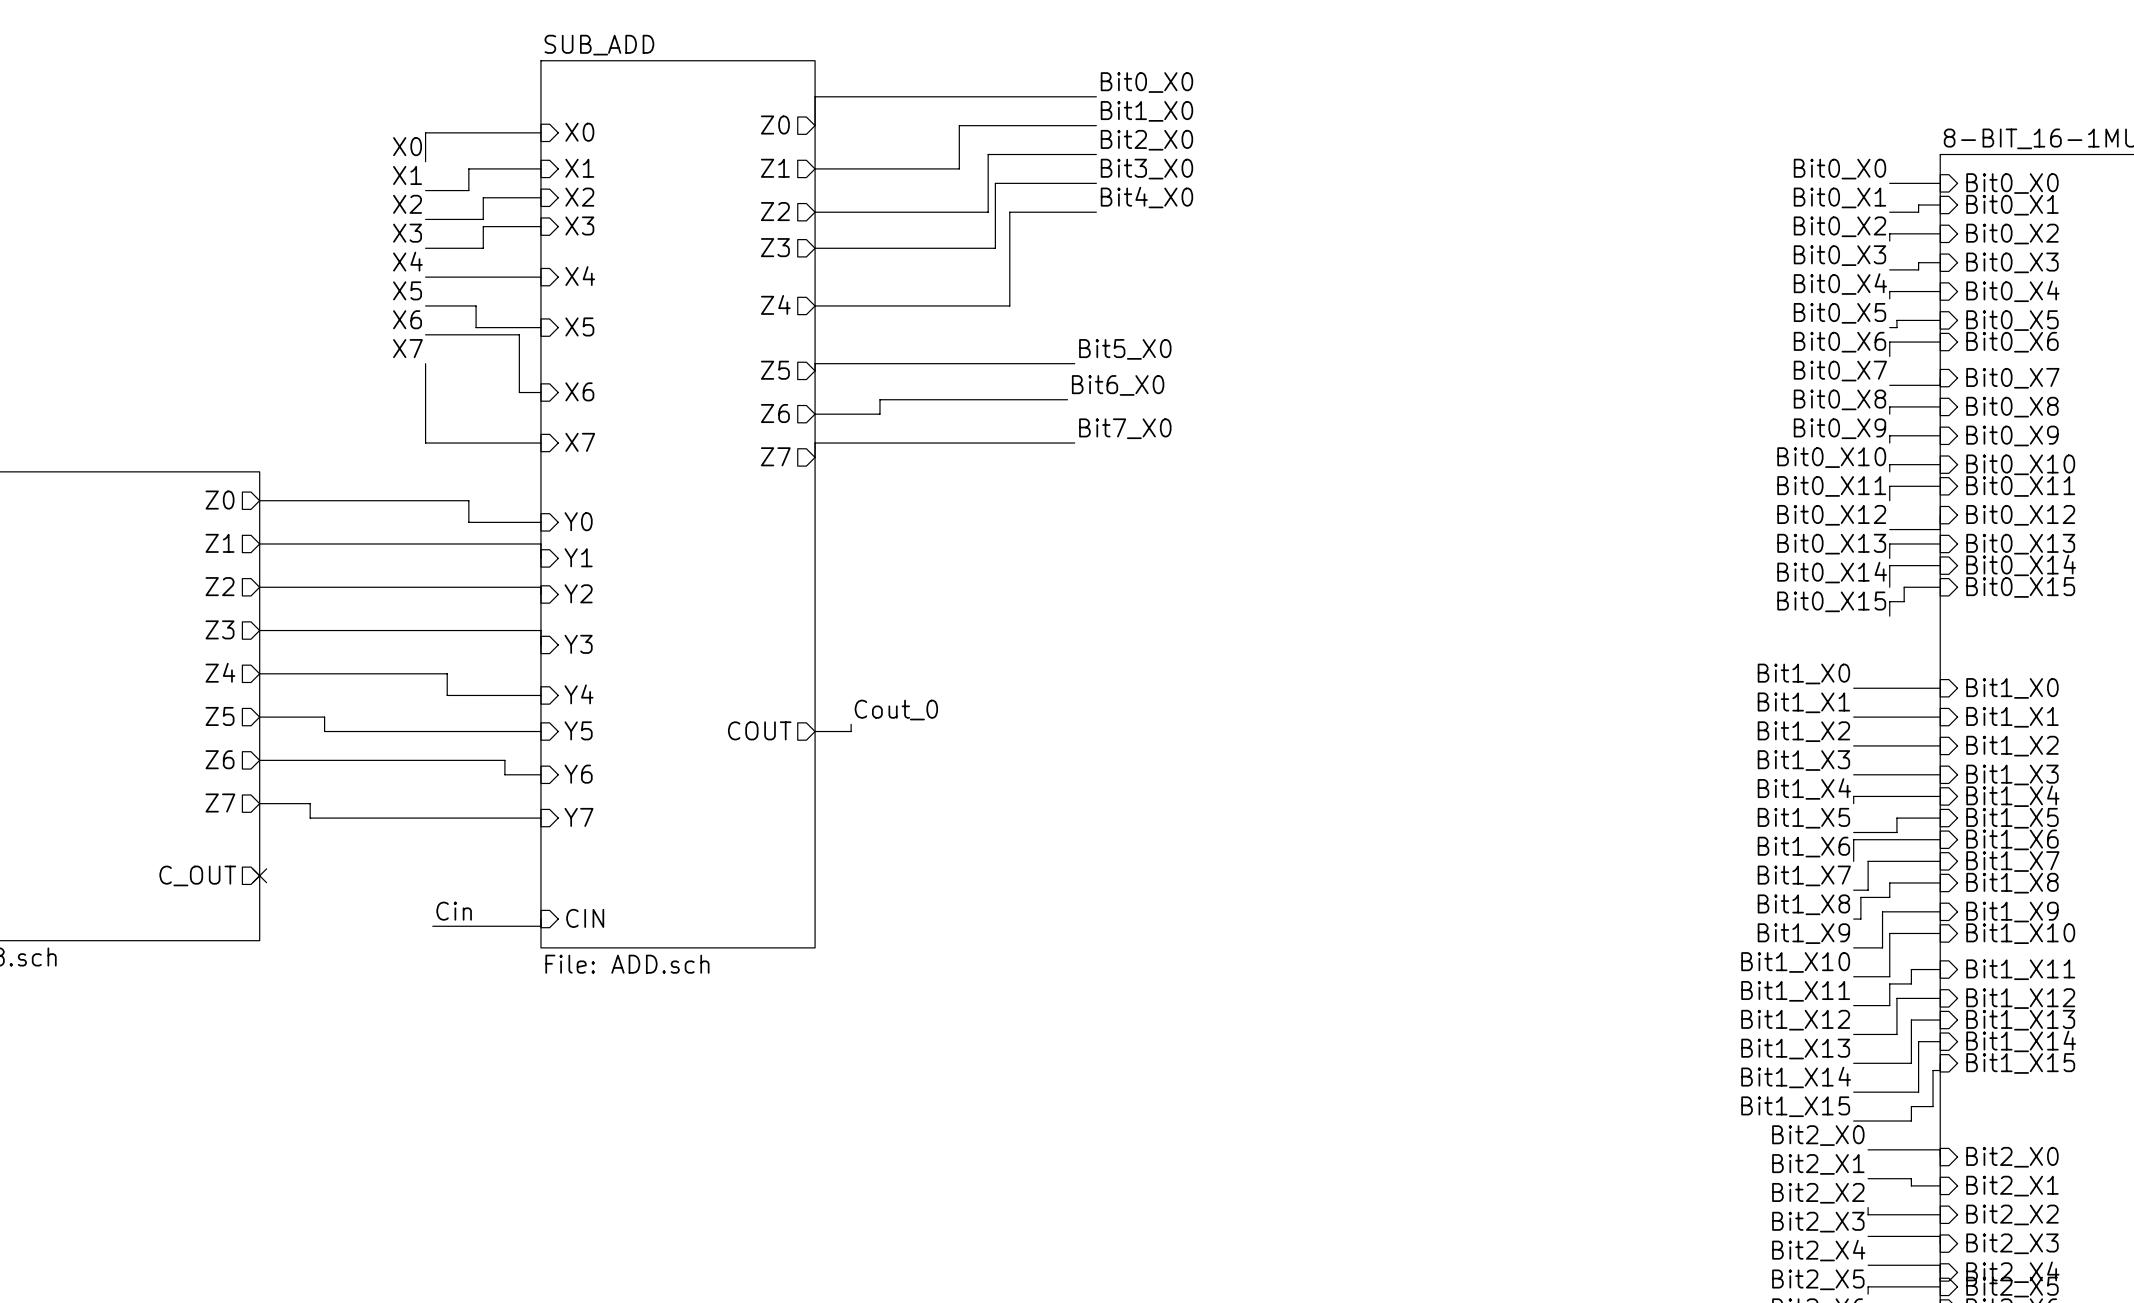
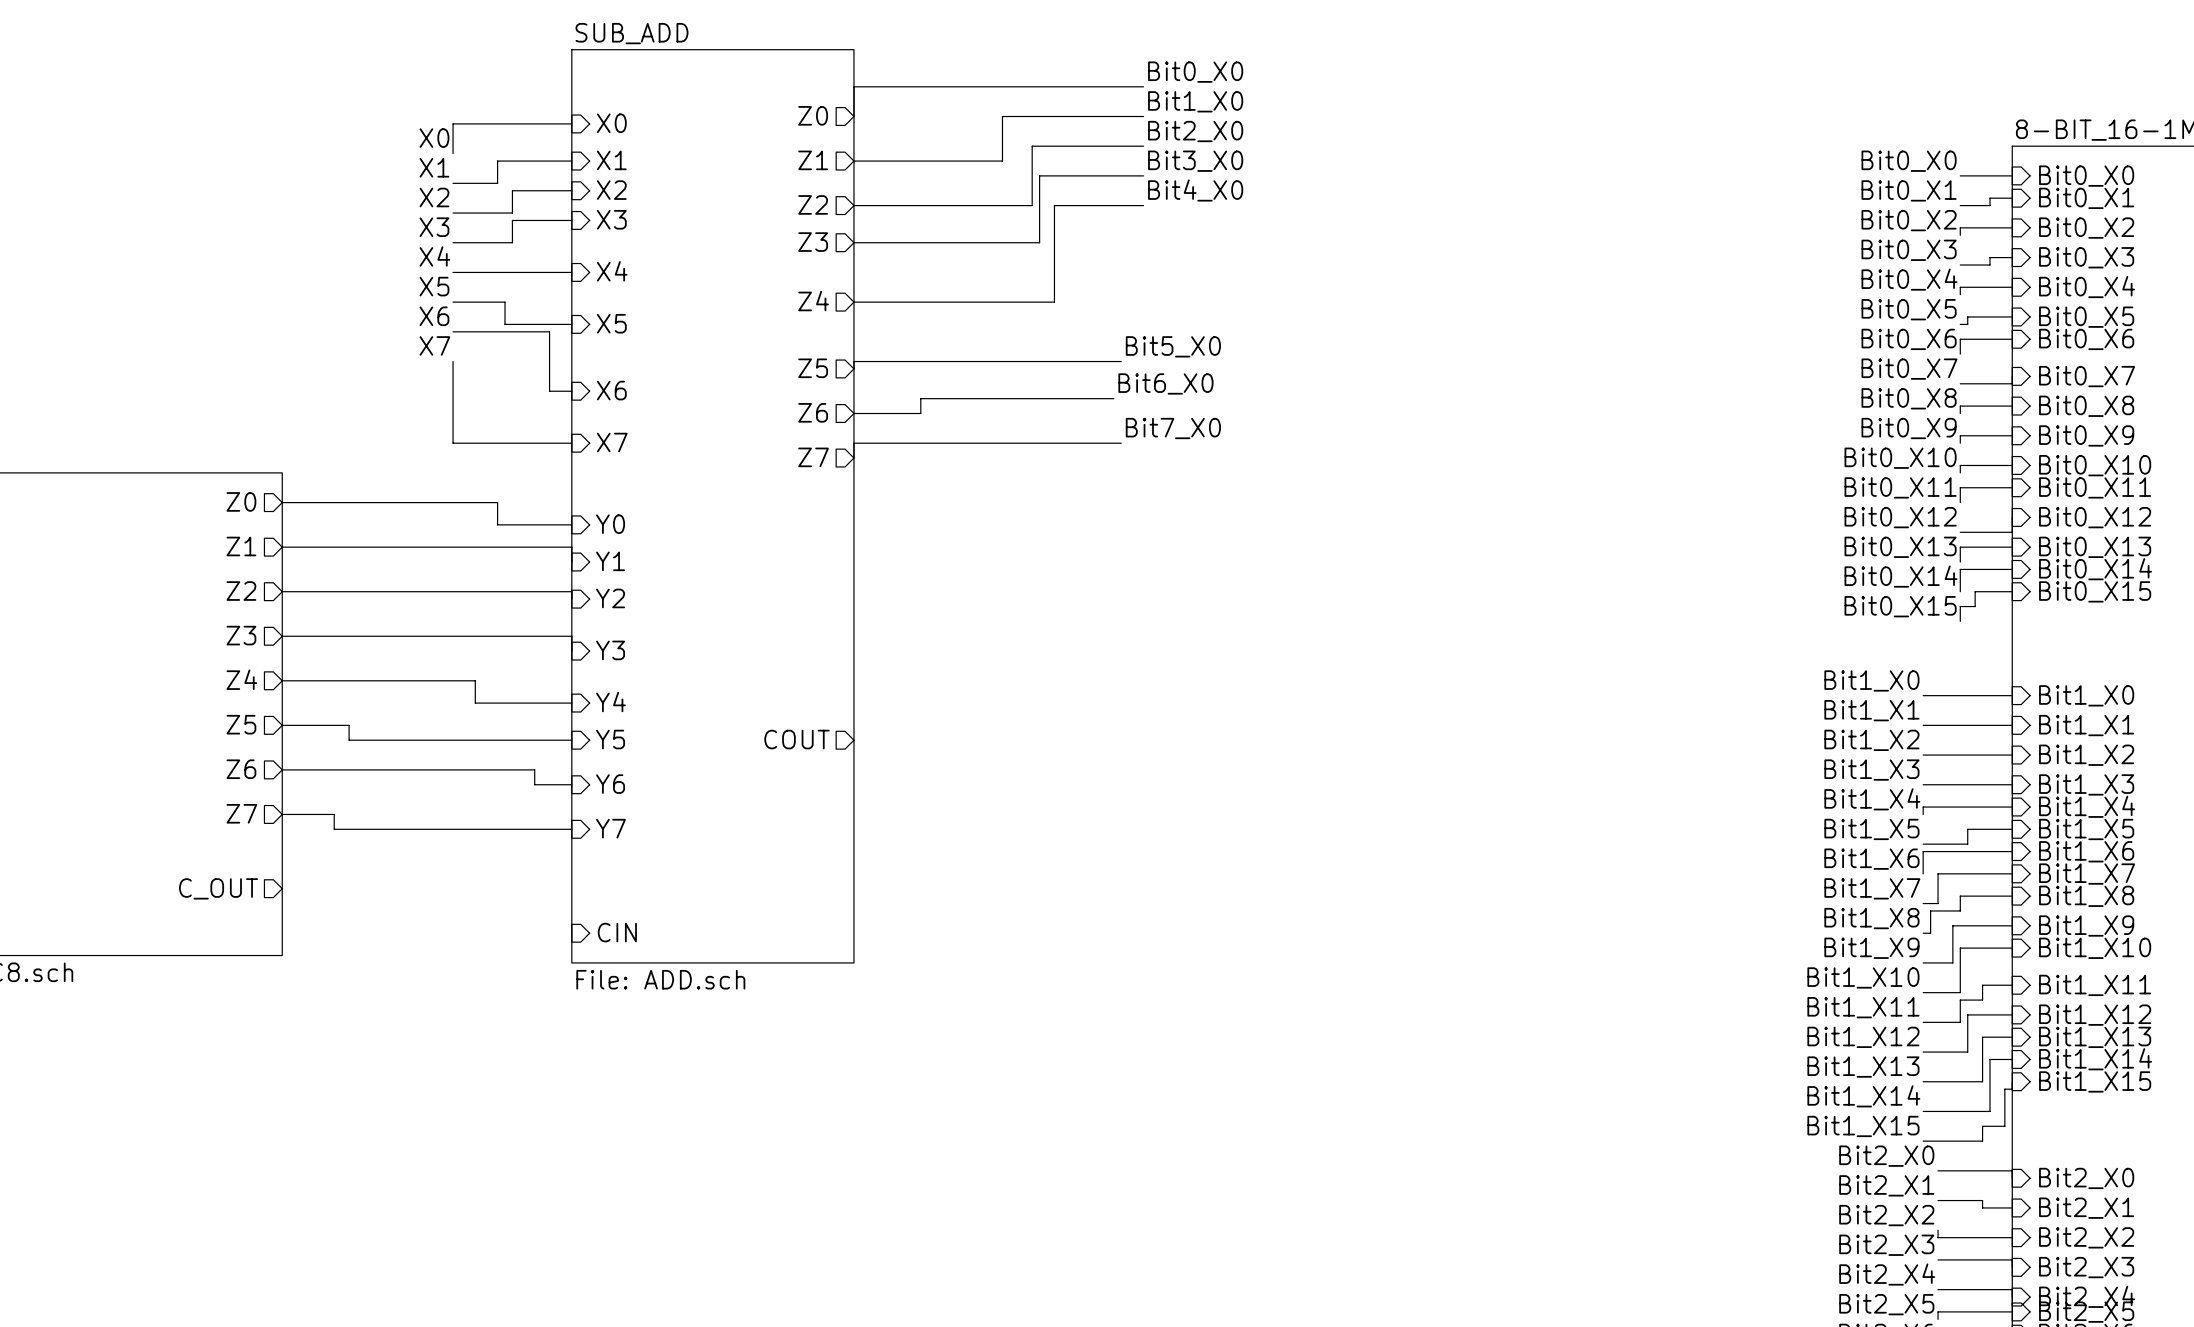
label: Cout_0 (896, 710) -> none
wire: (851, 724) (851, 731) (815, 731) -> none
no-connect mark: (259, 875) -> none
label: Cin (454, 911) -> none
wire: (540, 919) (540, 926) (432, 926) -> none

